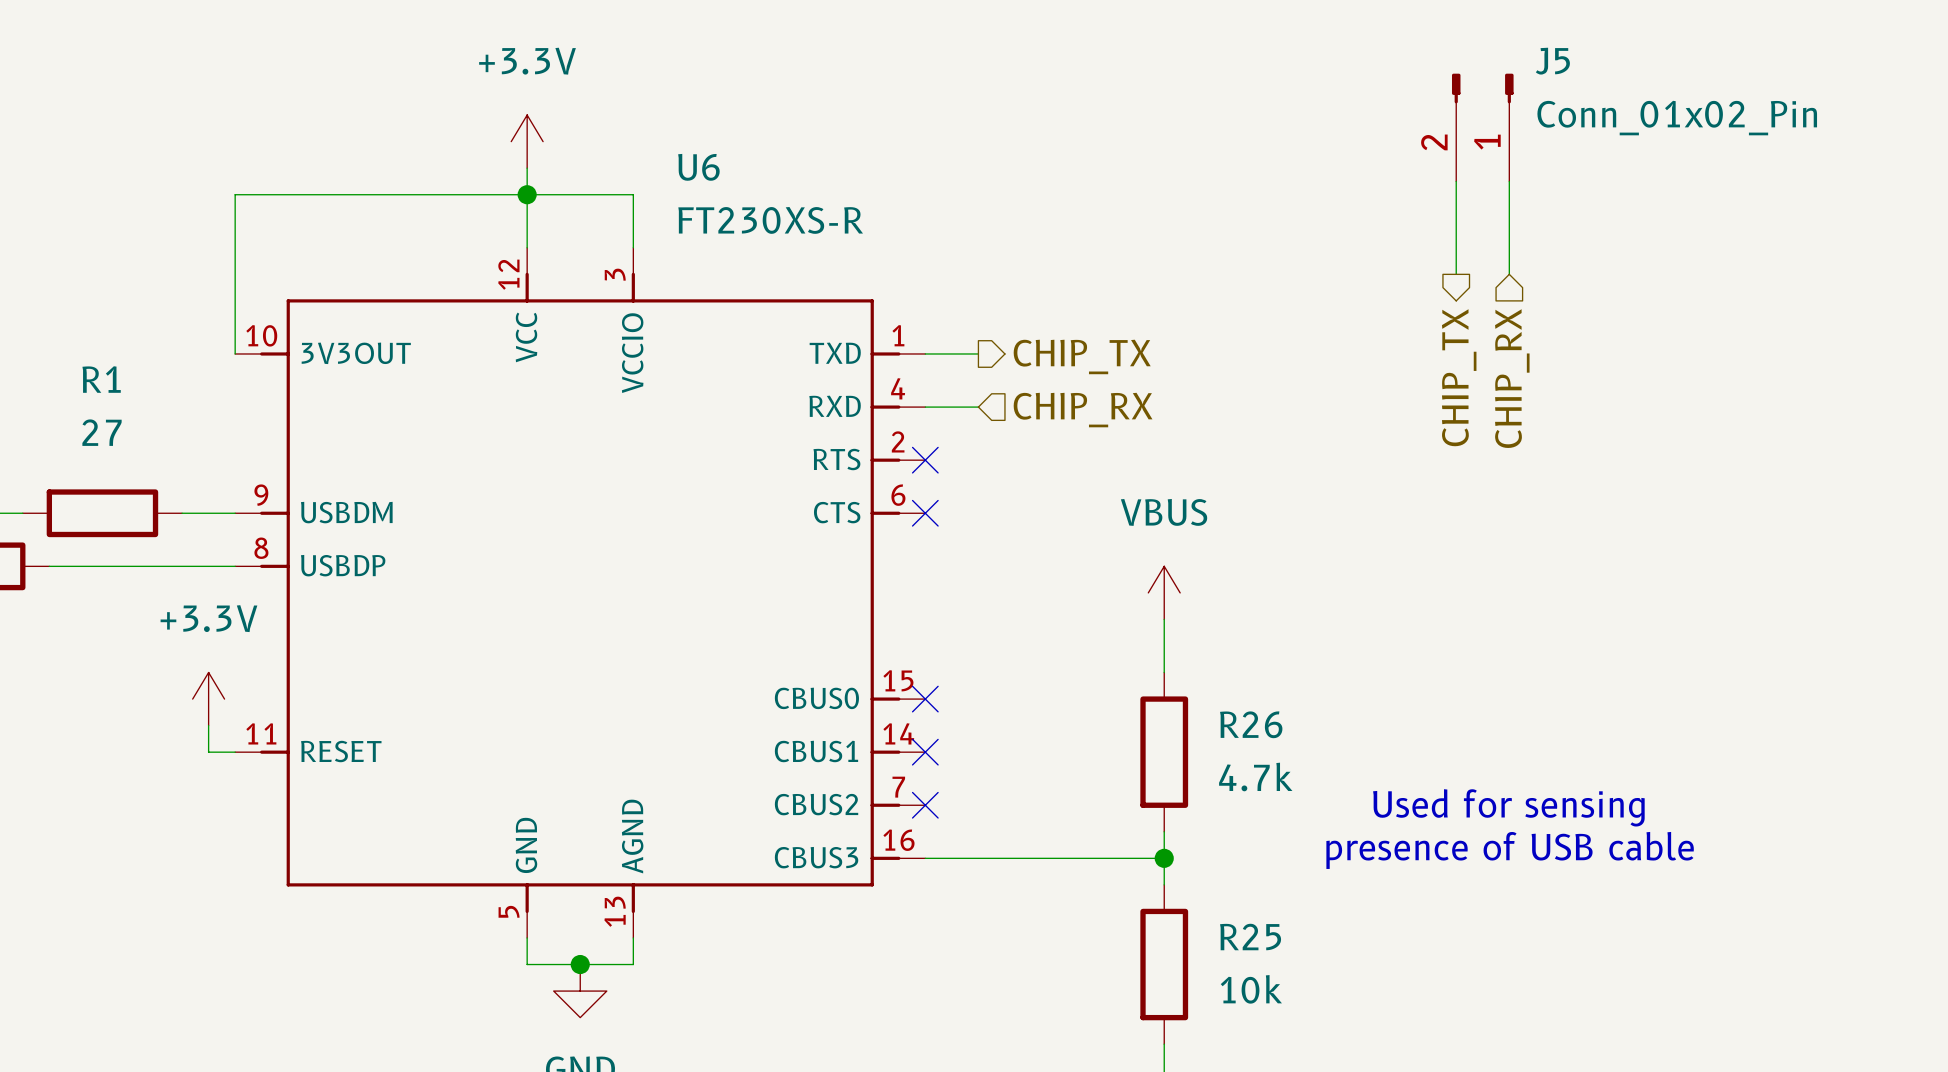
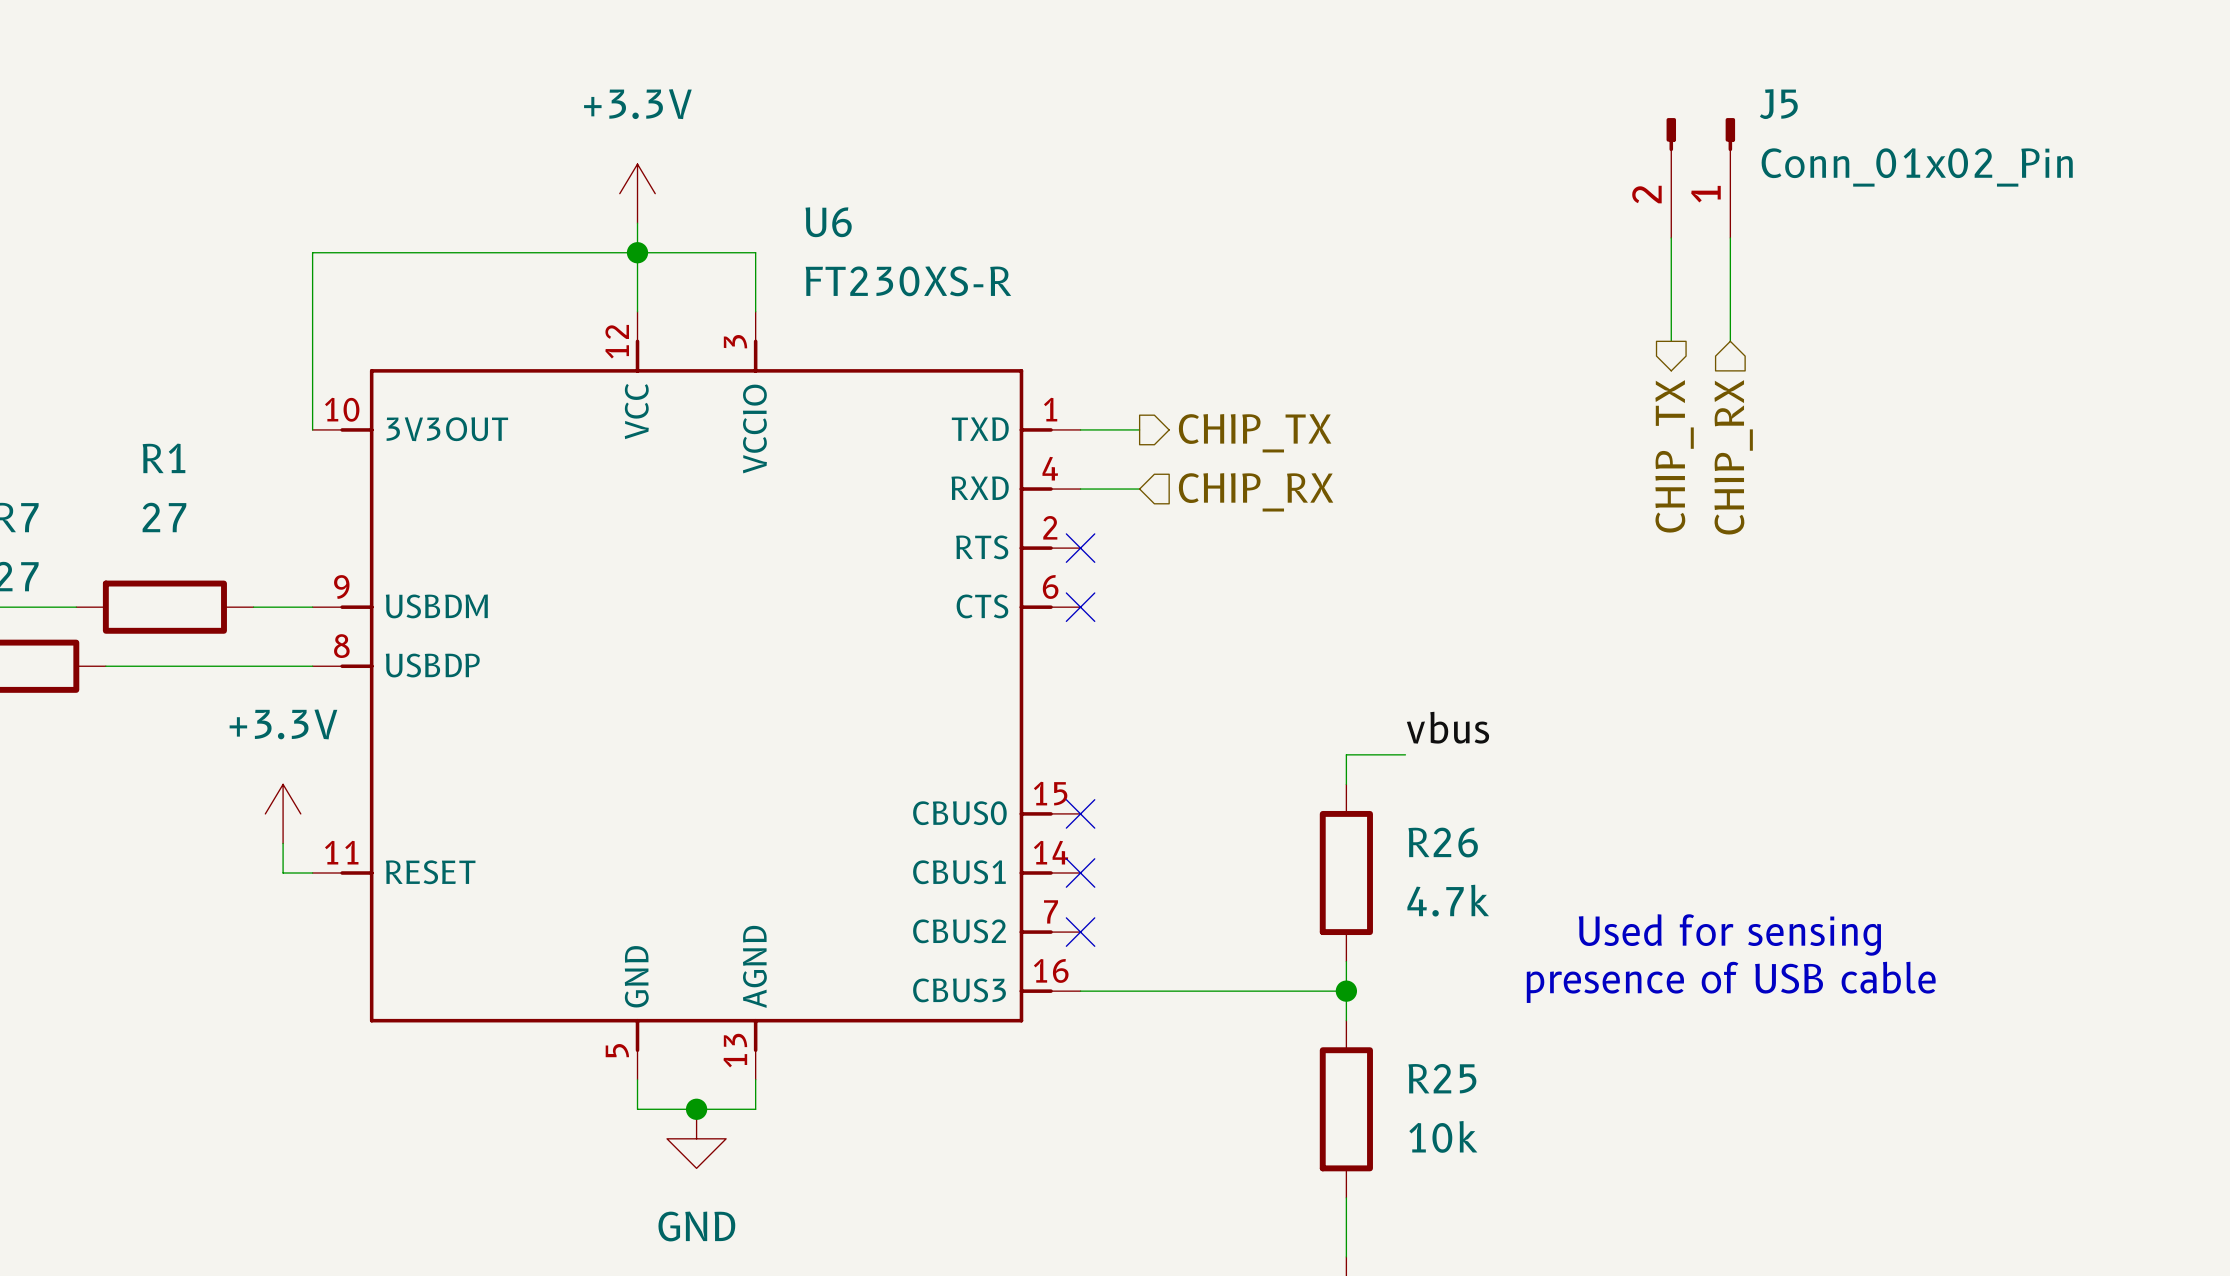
power symbol: VBUS (1164, 592) -> none
wire: (1164, 619) (1164, 645) -> (1405, 754) (1346, 754)
label: none -> vbus (1447, 727)

